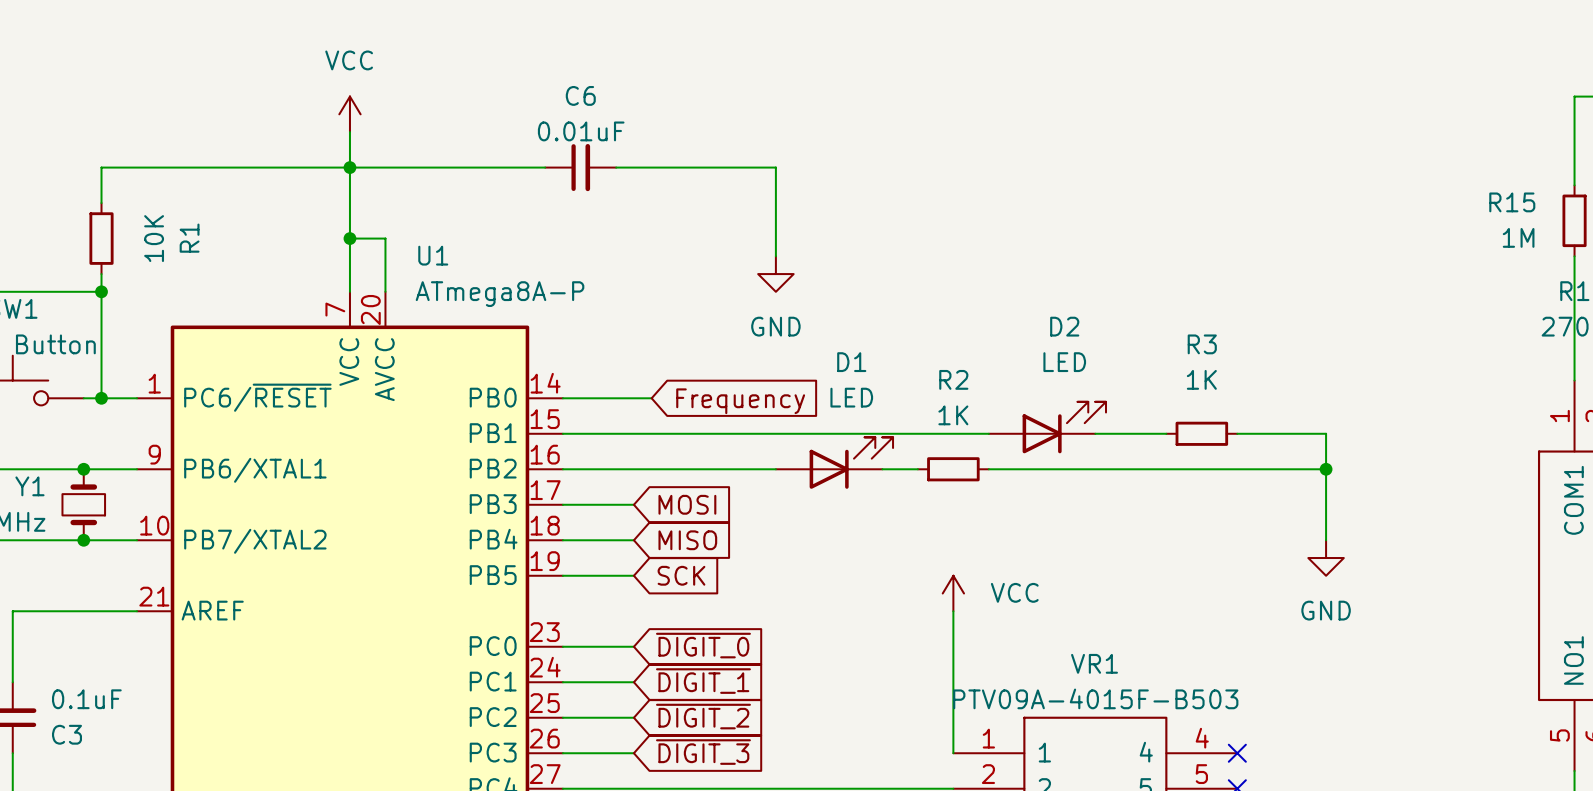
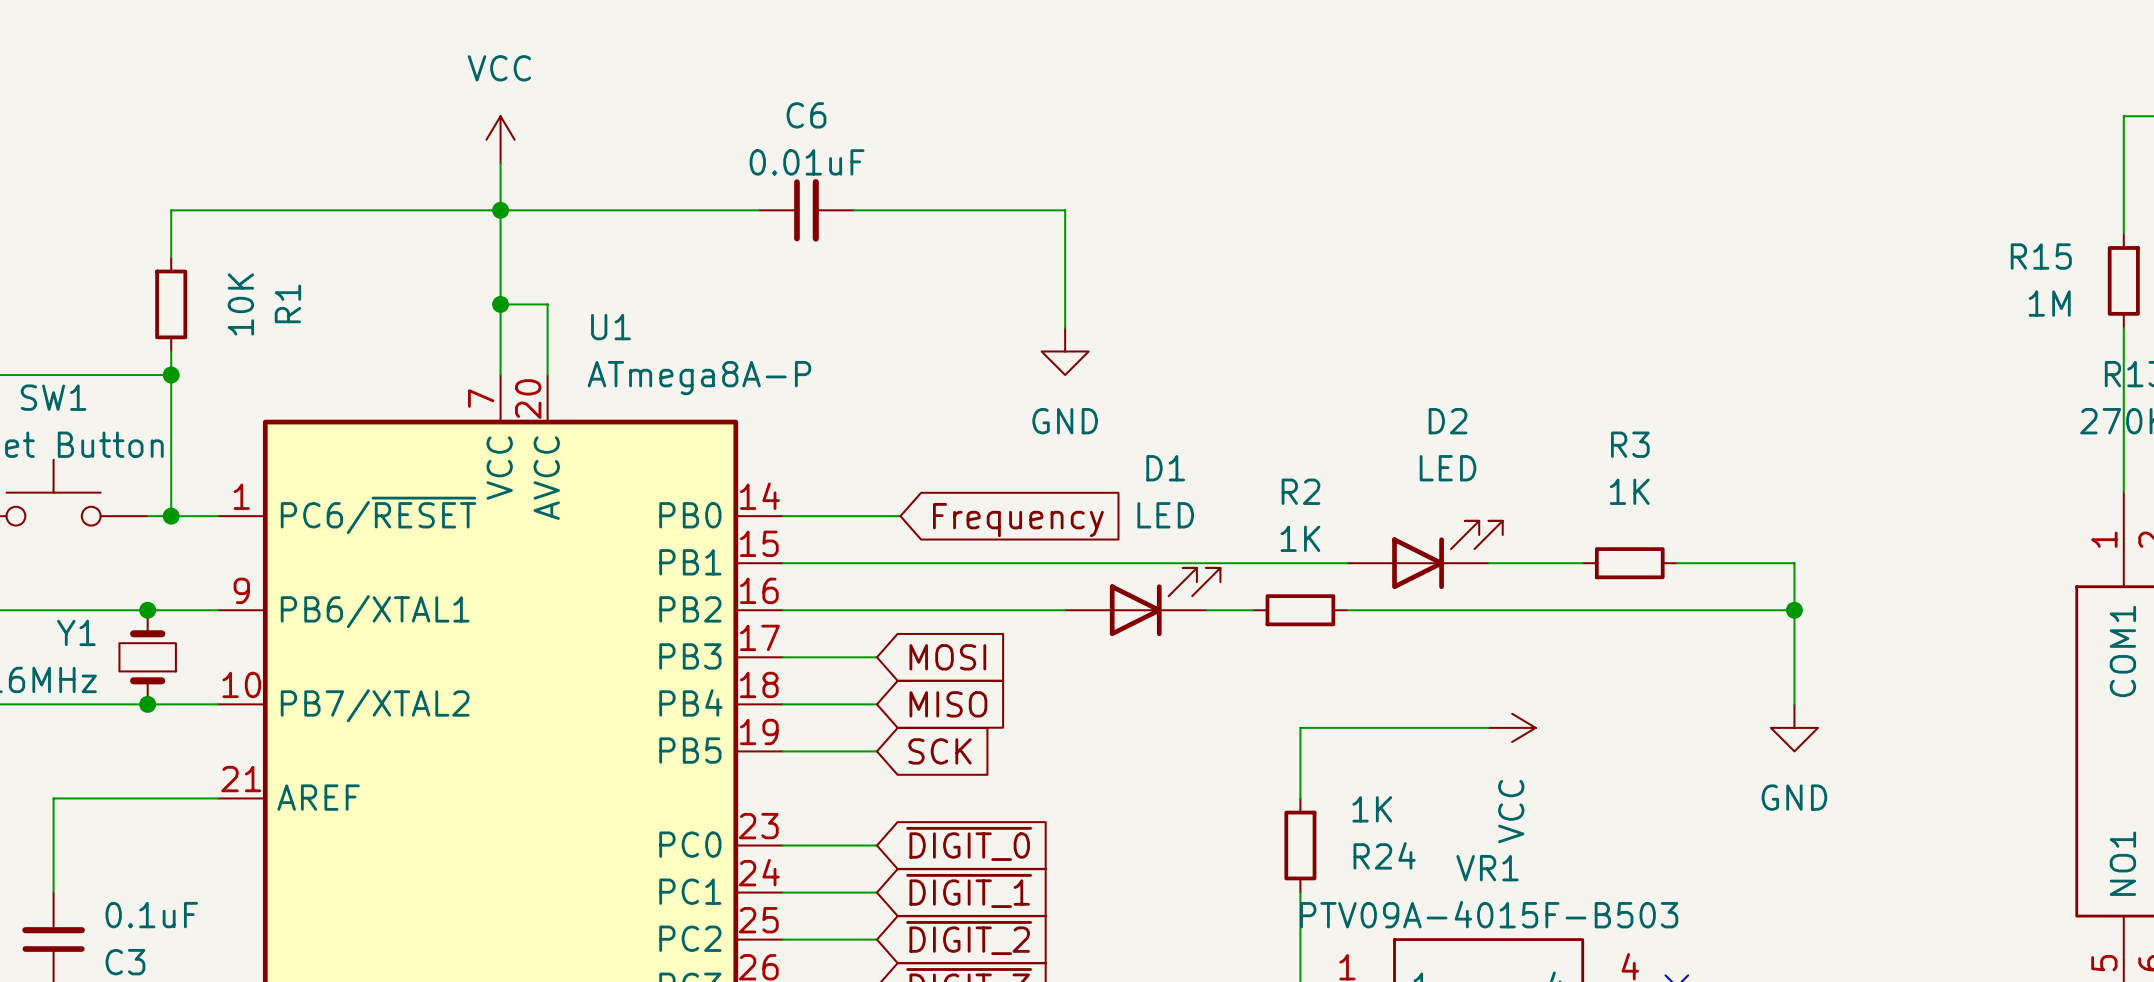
power symbol rotation: 0° (953, 593) -> 90° clockwise (1512, 727)
power symbol position: VCC (953, 593) -> VCC (1512, 727)
wire: (953, 611) (953, 682) -> (1300, 798) (1300, 727) (1488, 727)
R24: none -> 1K (1300, 845)

